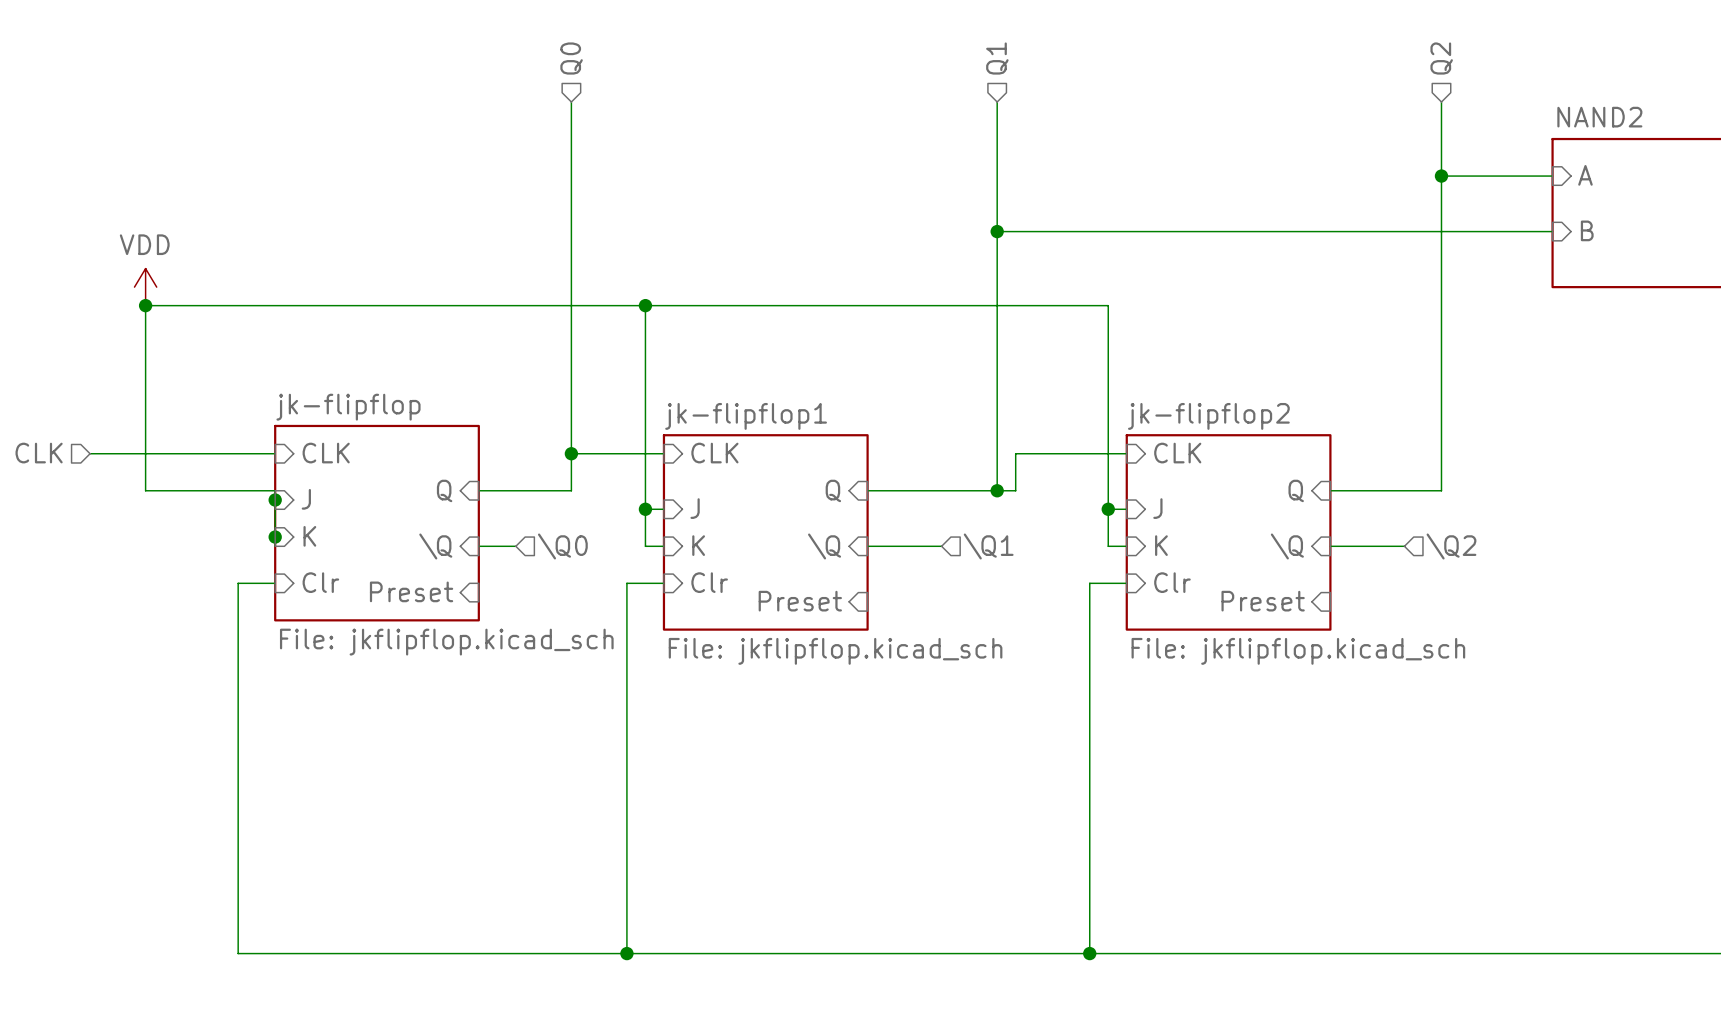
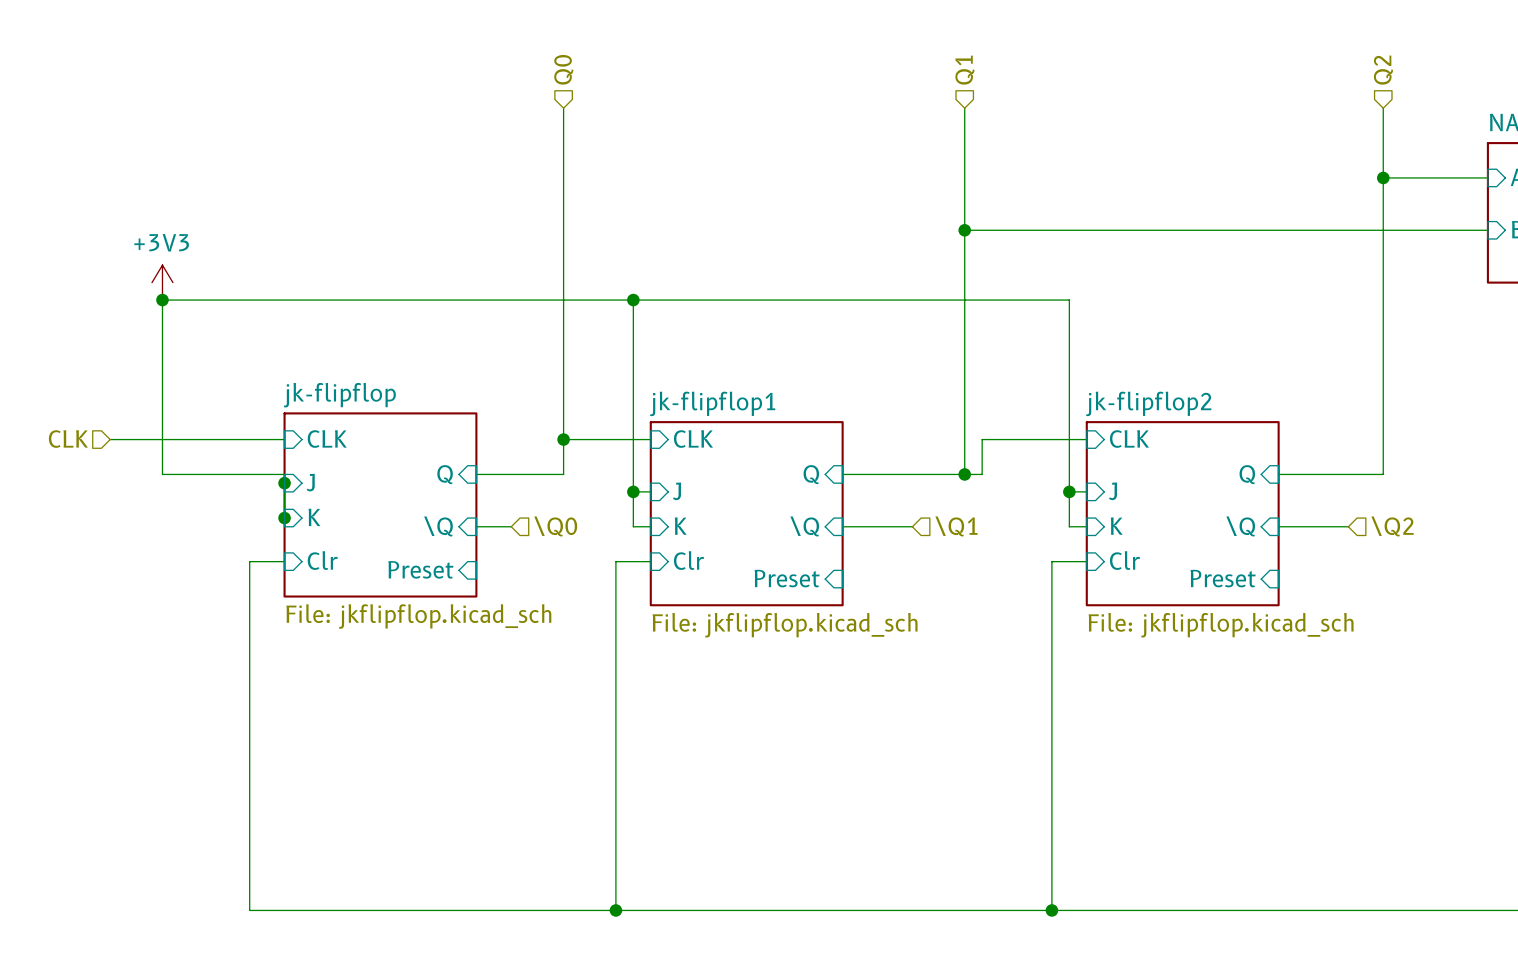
power symbol: VDD (145, 287) -> +3V3 (162, 282)

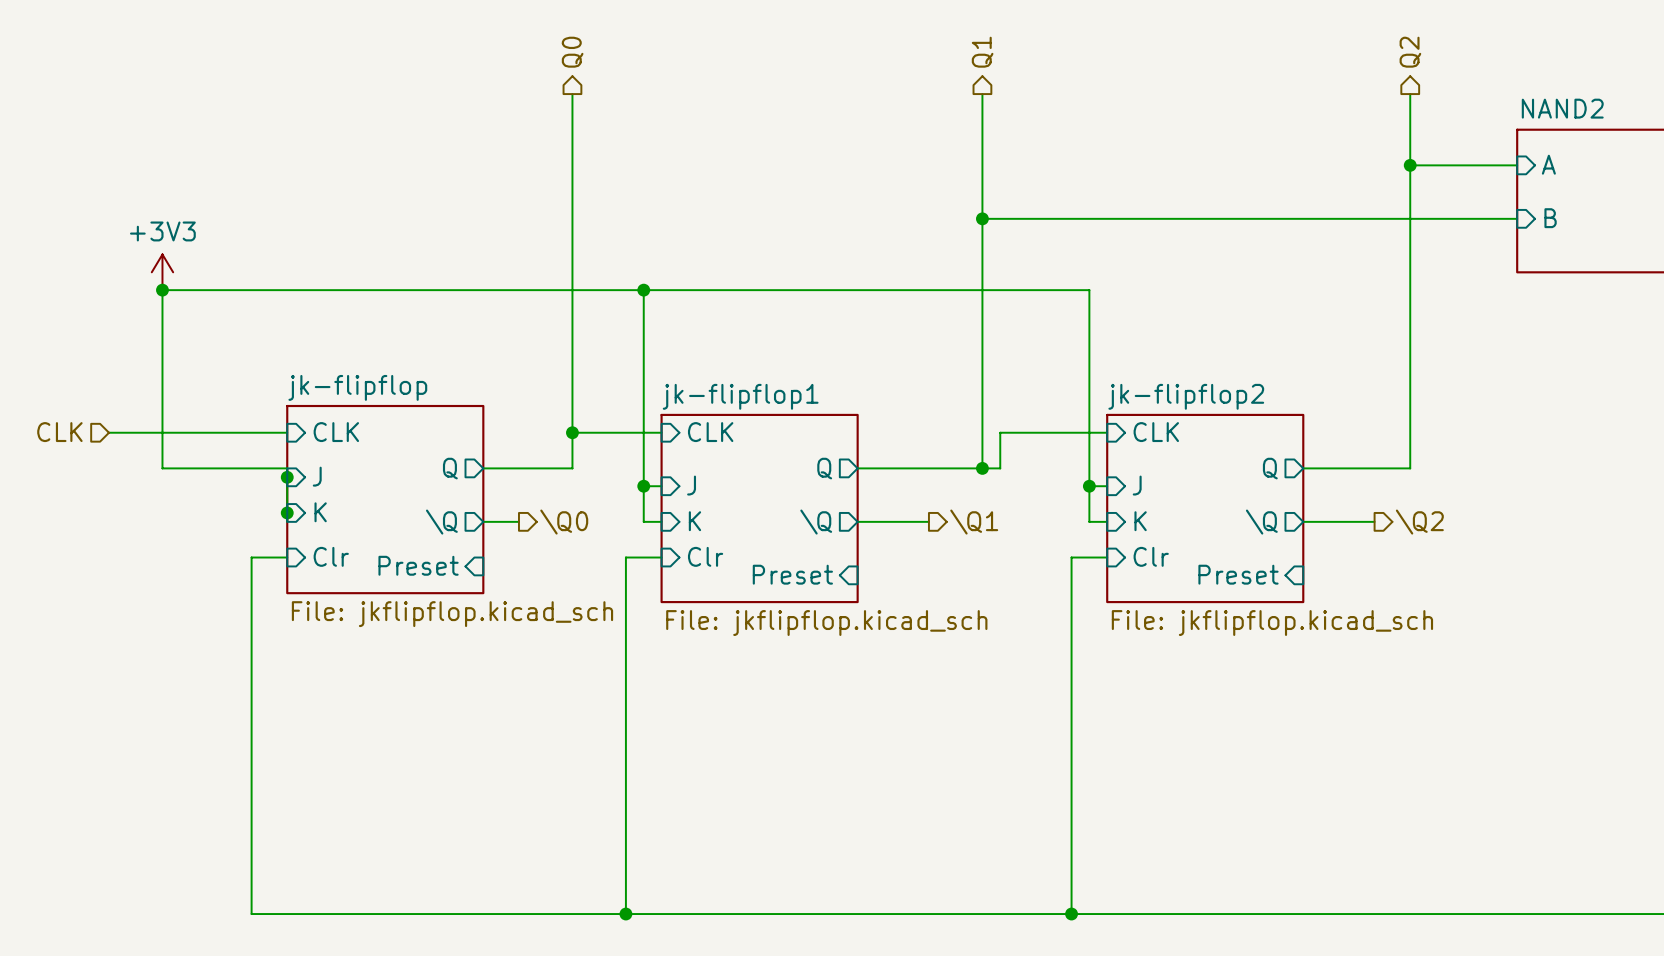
hierarchical label shape: input (563, 69) -> output (572, 52)
hierarchical label shape: input (964, 70) -> output (982, 52)
hierarchical label shape: input (1383, 70) -> output (1410, 52)
sheet pin shape: input (445, 474) -> output (450, 468)
sheet pin shape: input (811, 474) -> output (824, 468)
sheet pin shape: input (1247, 474) -> output (1270, 468)
sheet pin shape: input (438, 526) -> output (441, 522)
hierarchical label shape: input (555, 526) -> output (564, 522)
sheet pin shape: input (804, 526) -> output (816, 522)
hierarchical label shape: input (956, 526) -> output (974, 522)
sheet pin shape: input (1240, 526) -> output (1261, 522)
hierarchical label shape: input (1392, 526) -> output (1419, 522)

